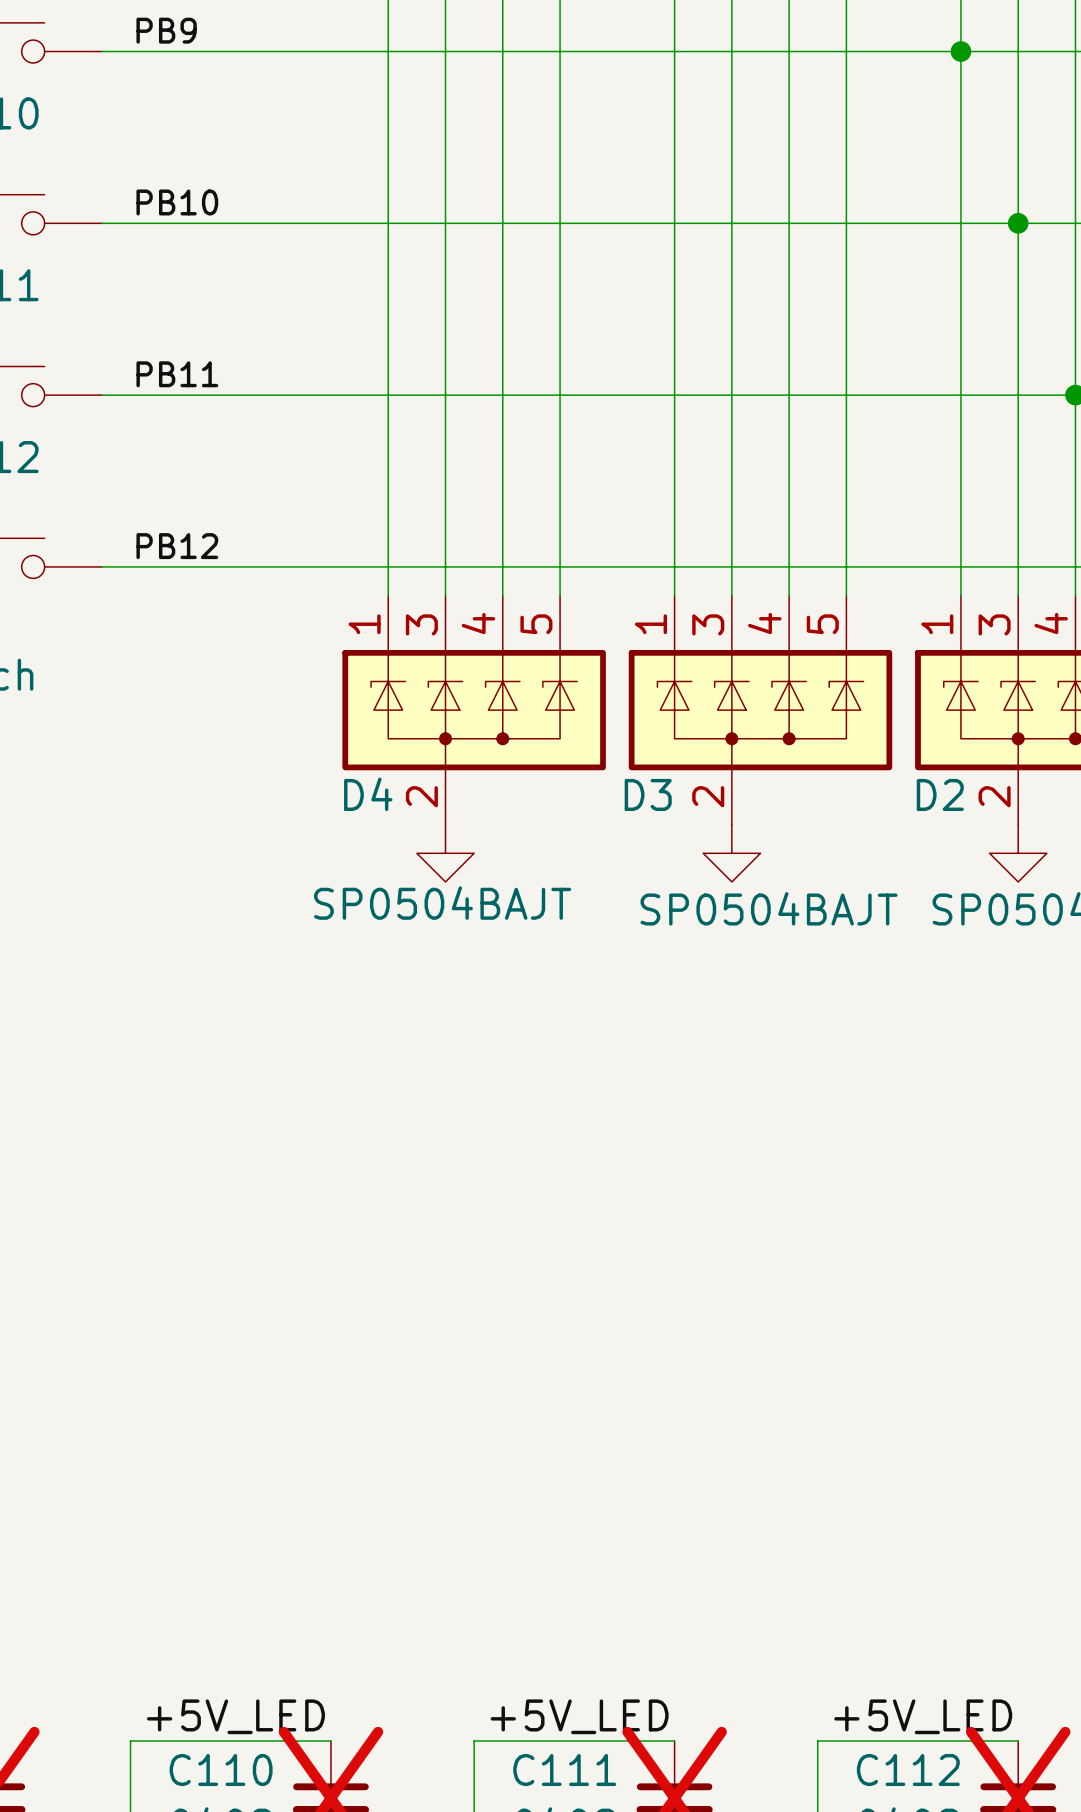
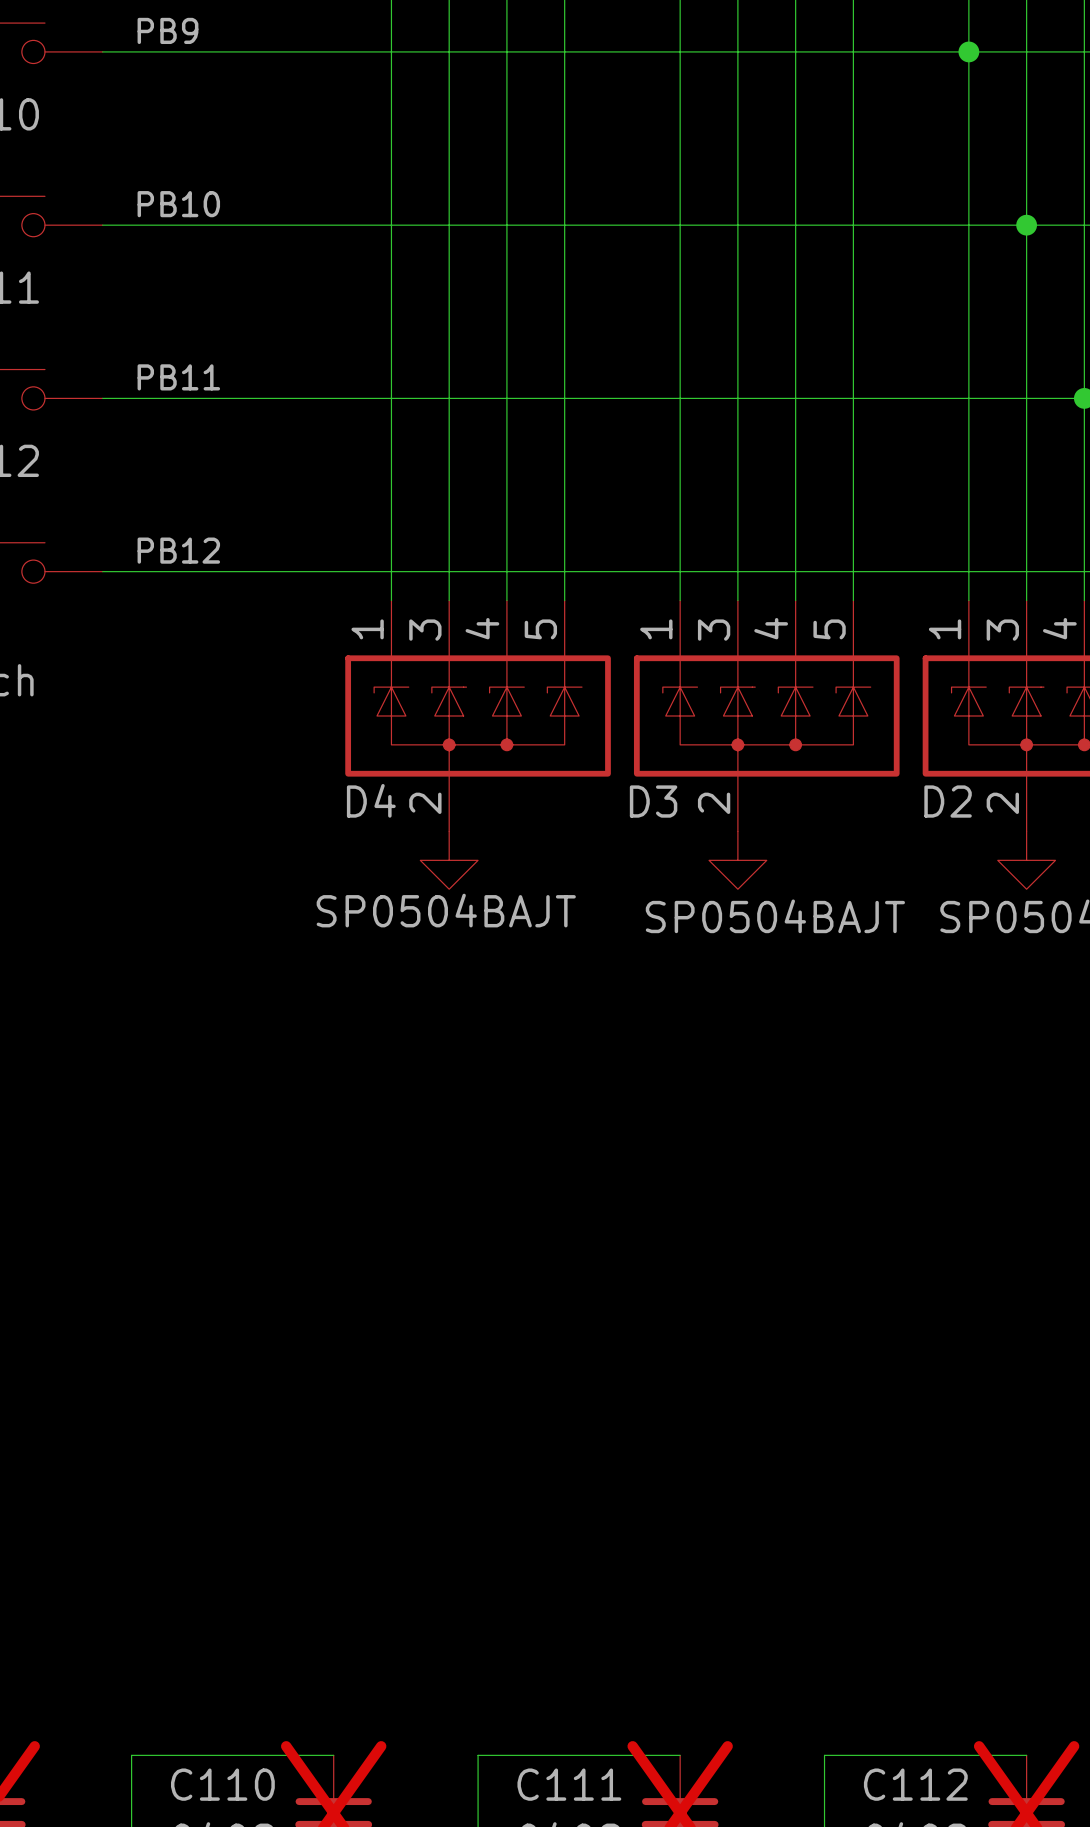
label: +5V_LED (235, 1716) -> none
label: +5V_LED (579, 1716) -> none
label: +5V_LED (923, 1716) -> none

